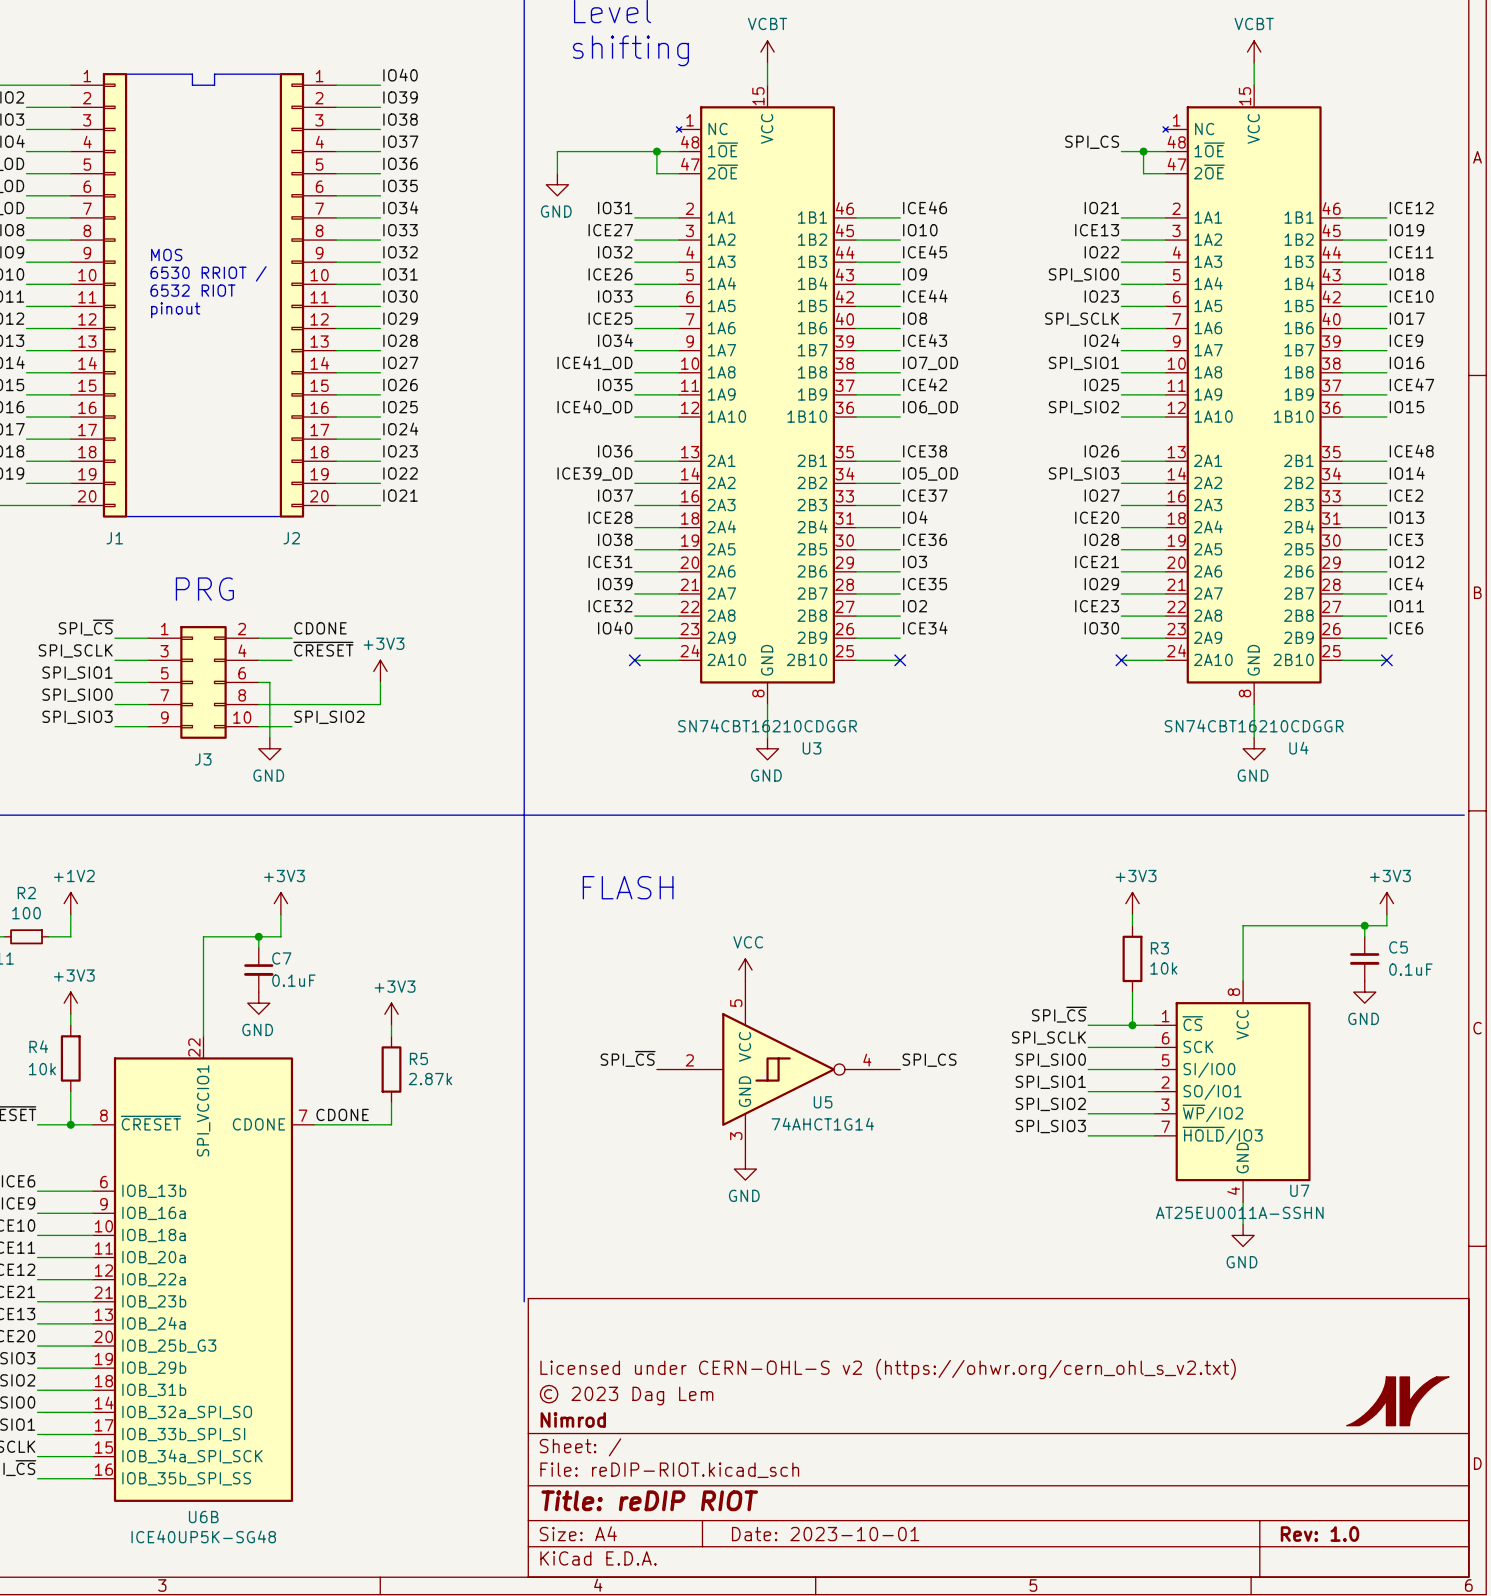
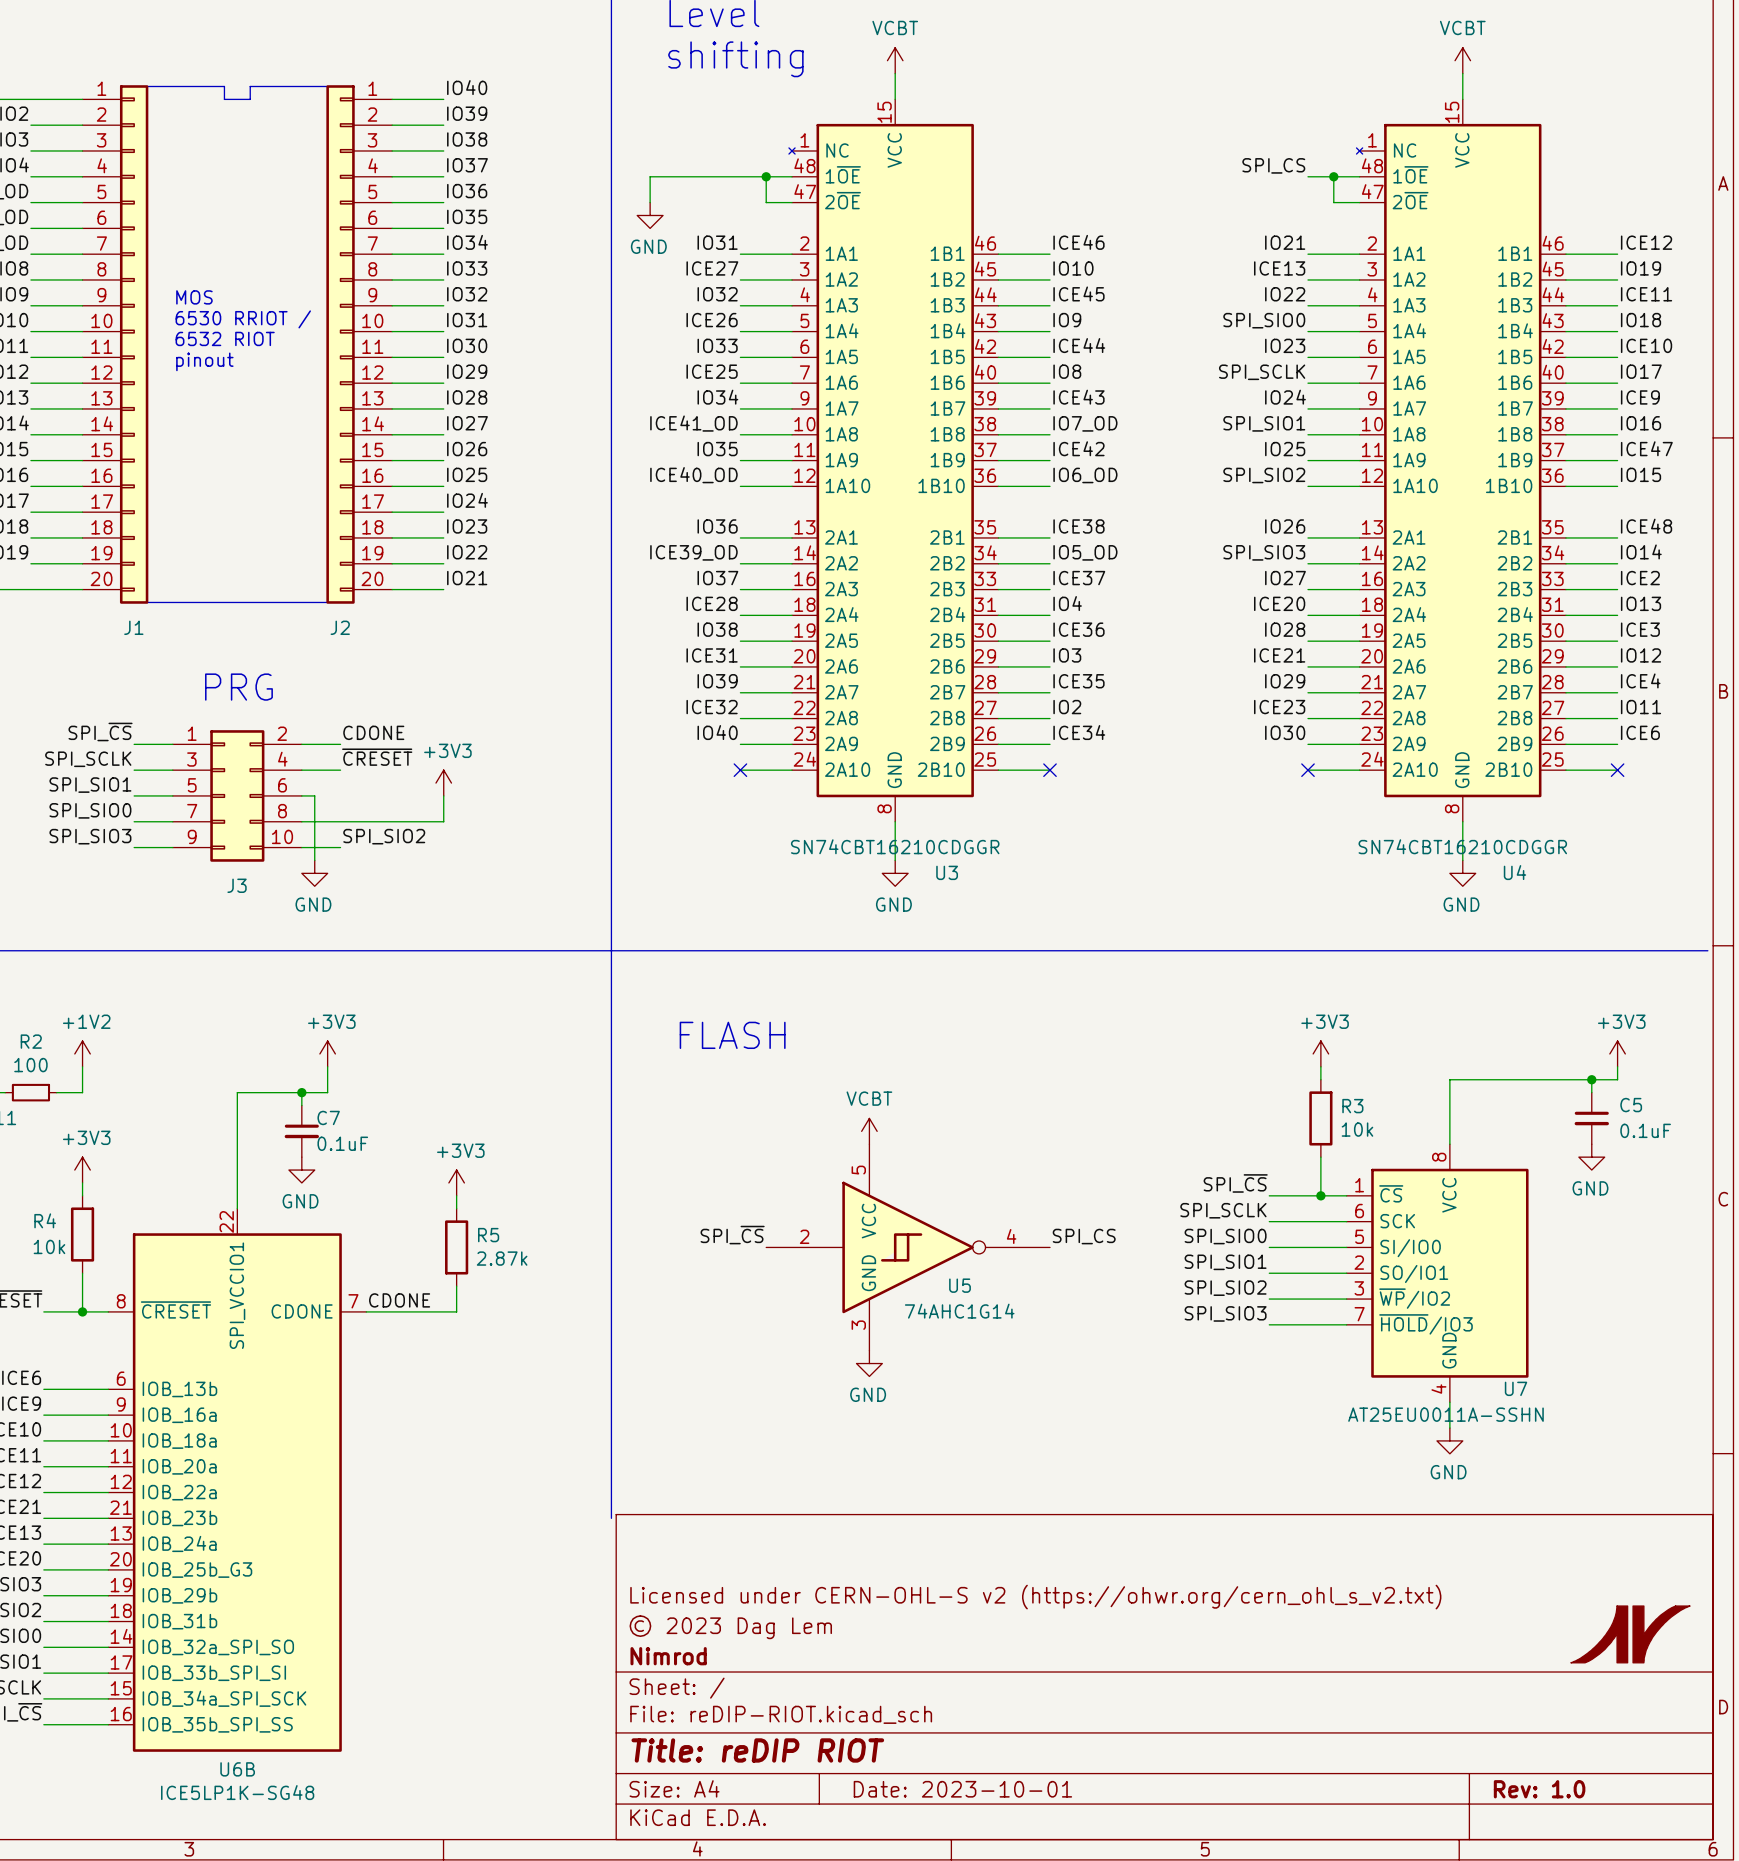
power symbol: VCC (745, 969) -> VCBT (869, 1131)
U5 value: 74AHCT1G14 (822, 1124) -> 74AHC1G14 (959, 1311)
U6B value: ICE40UP5K-SG48 (203, 1536) -> ICE5LP1K-SG48 (237, 1792)

